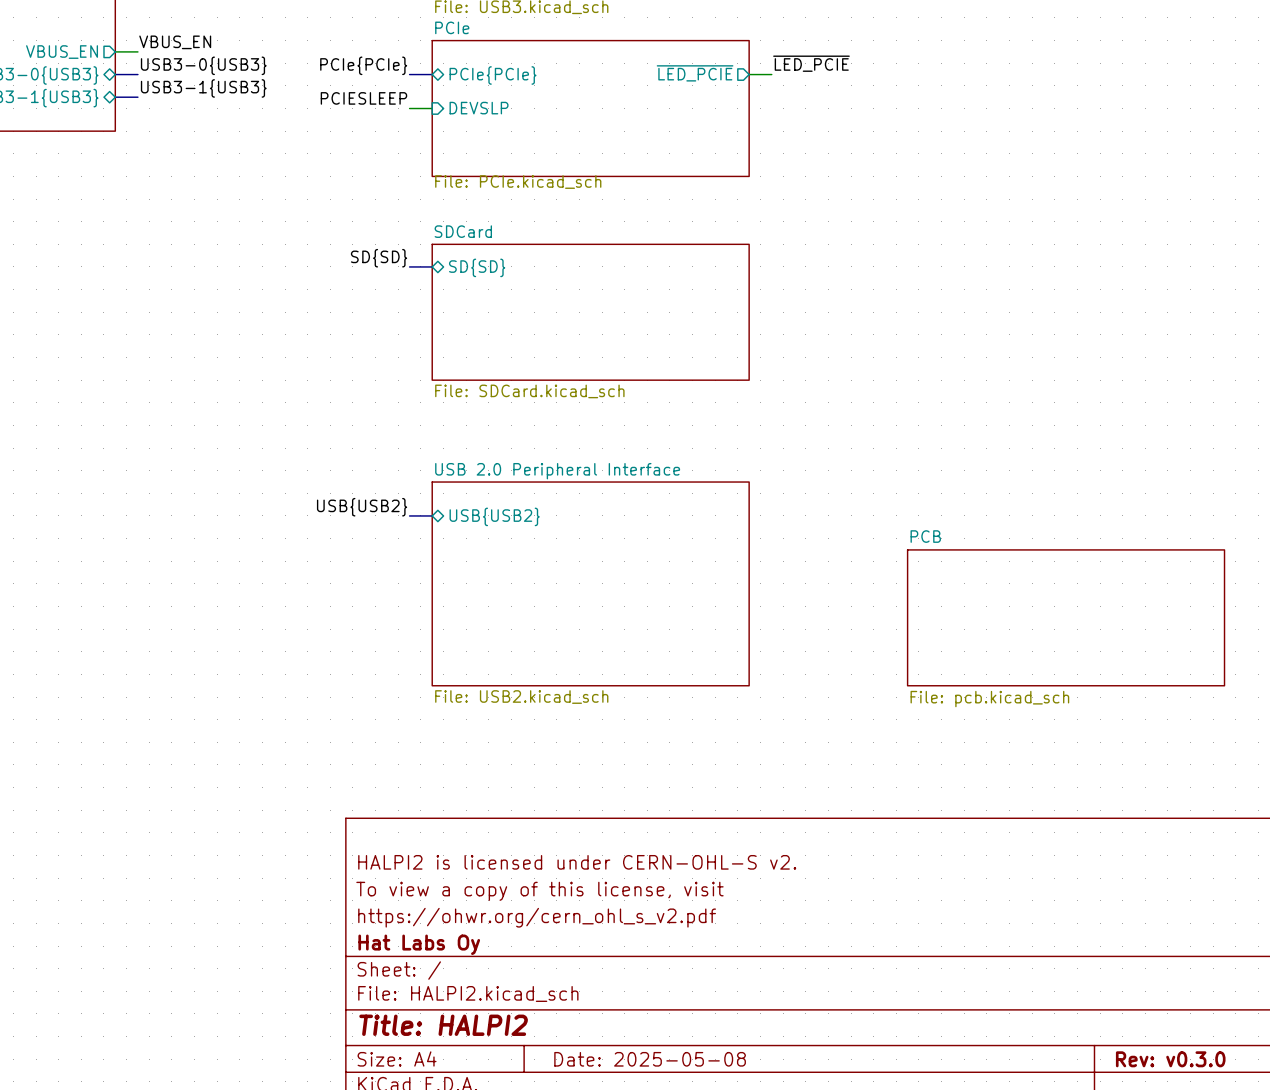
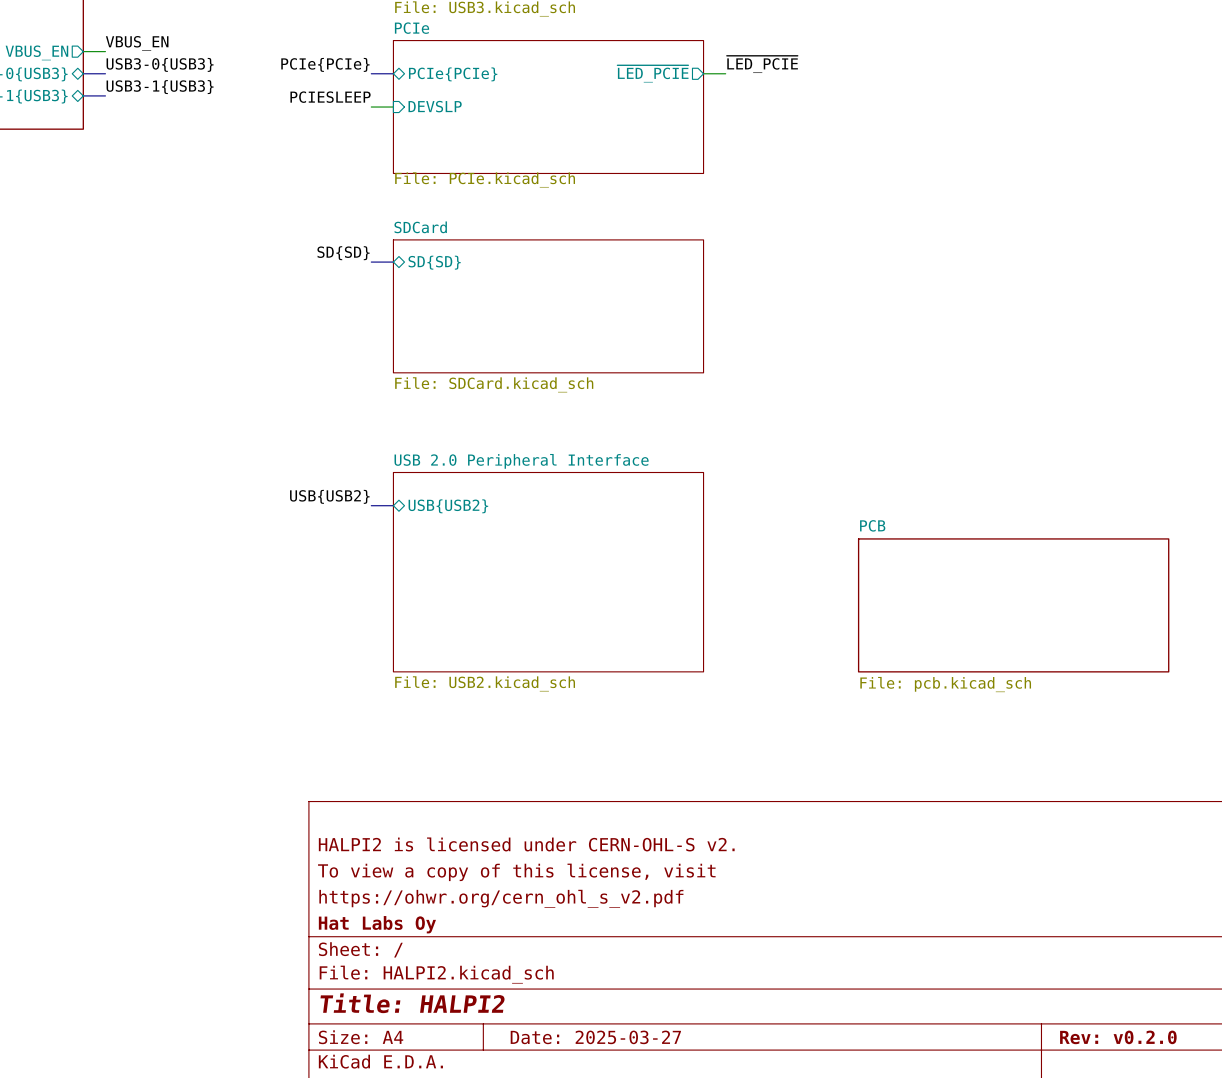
title block: Date: 2025-05-08 (650, 1059) -> Date: 2025-03-27 (595, 1037)
title block: Rev: v0.3.0 (1170, 1059) -> Rev: v0.2.0 (1118, 1037)

